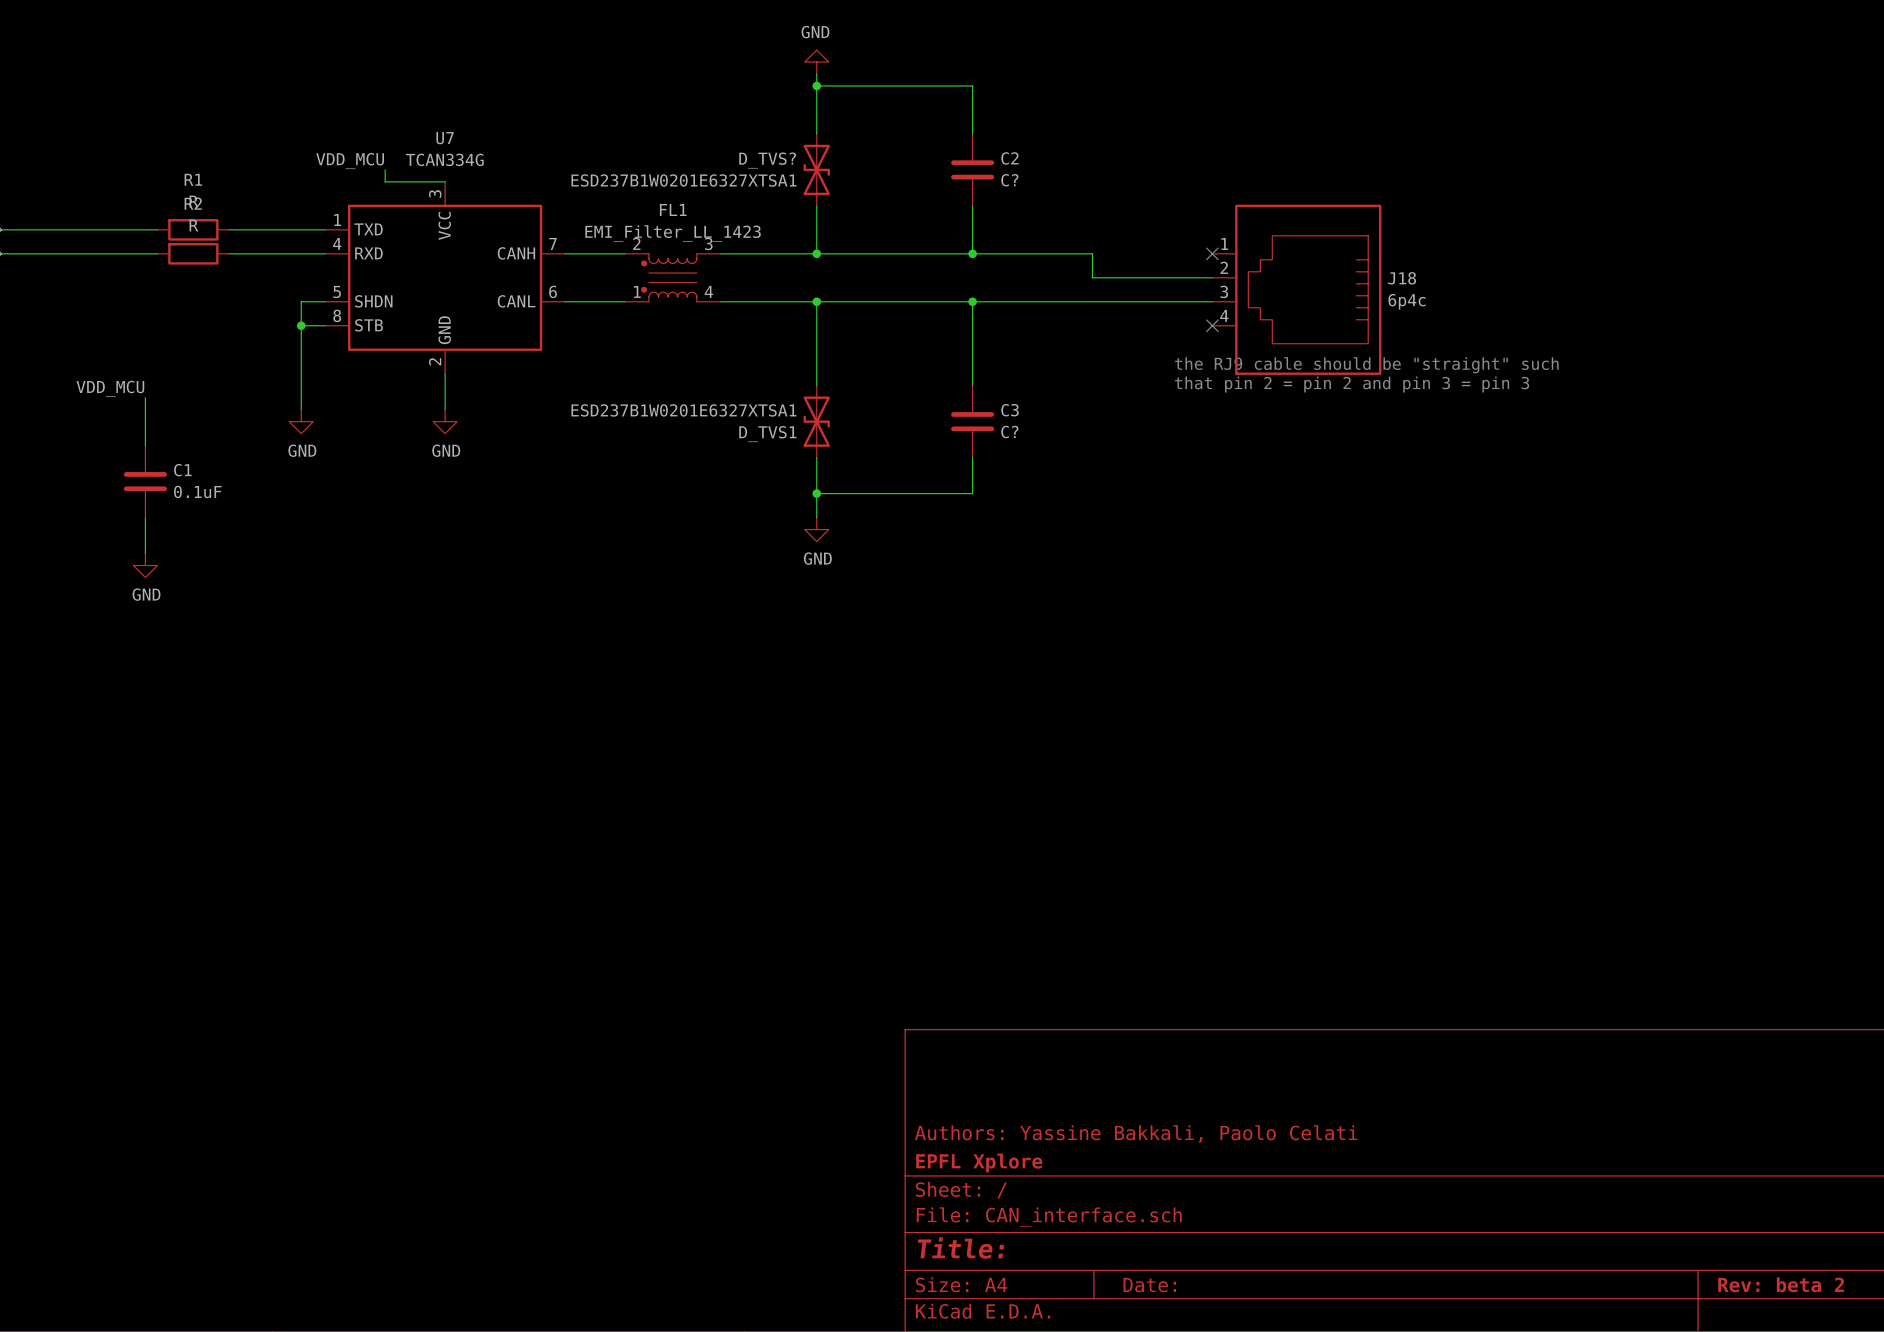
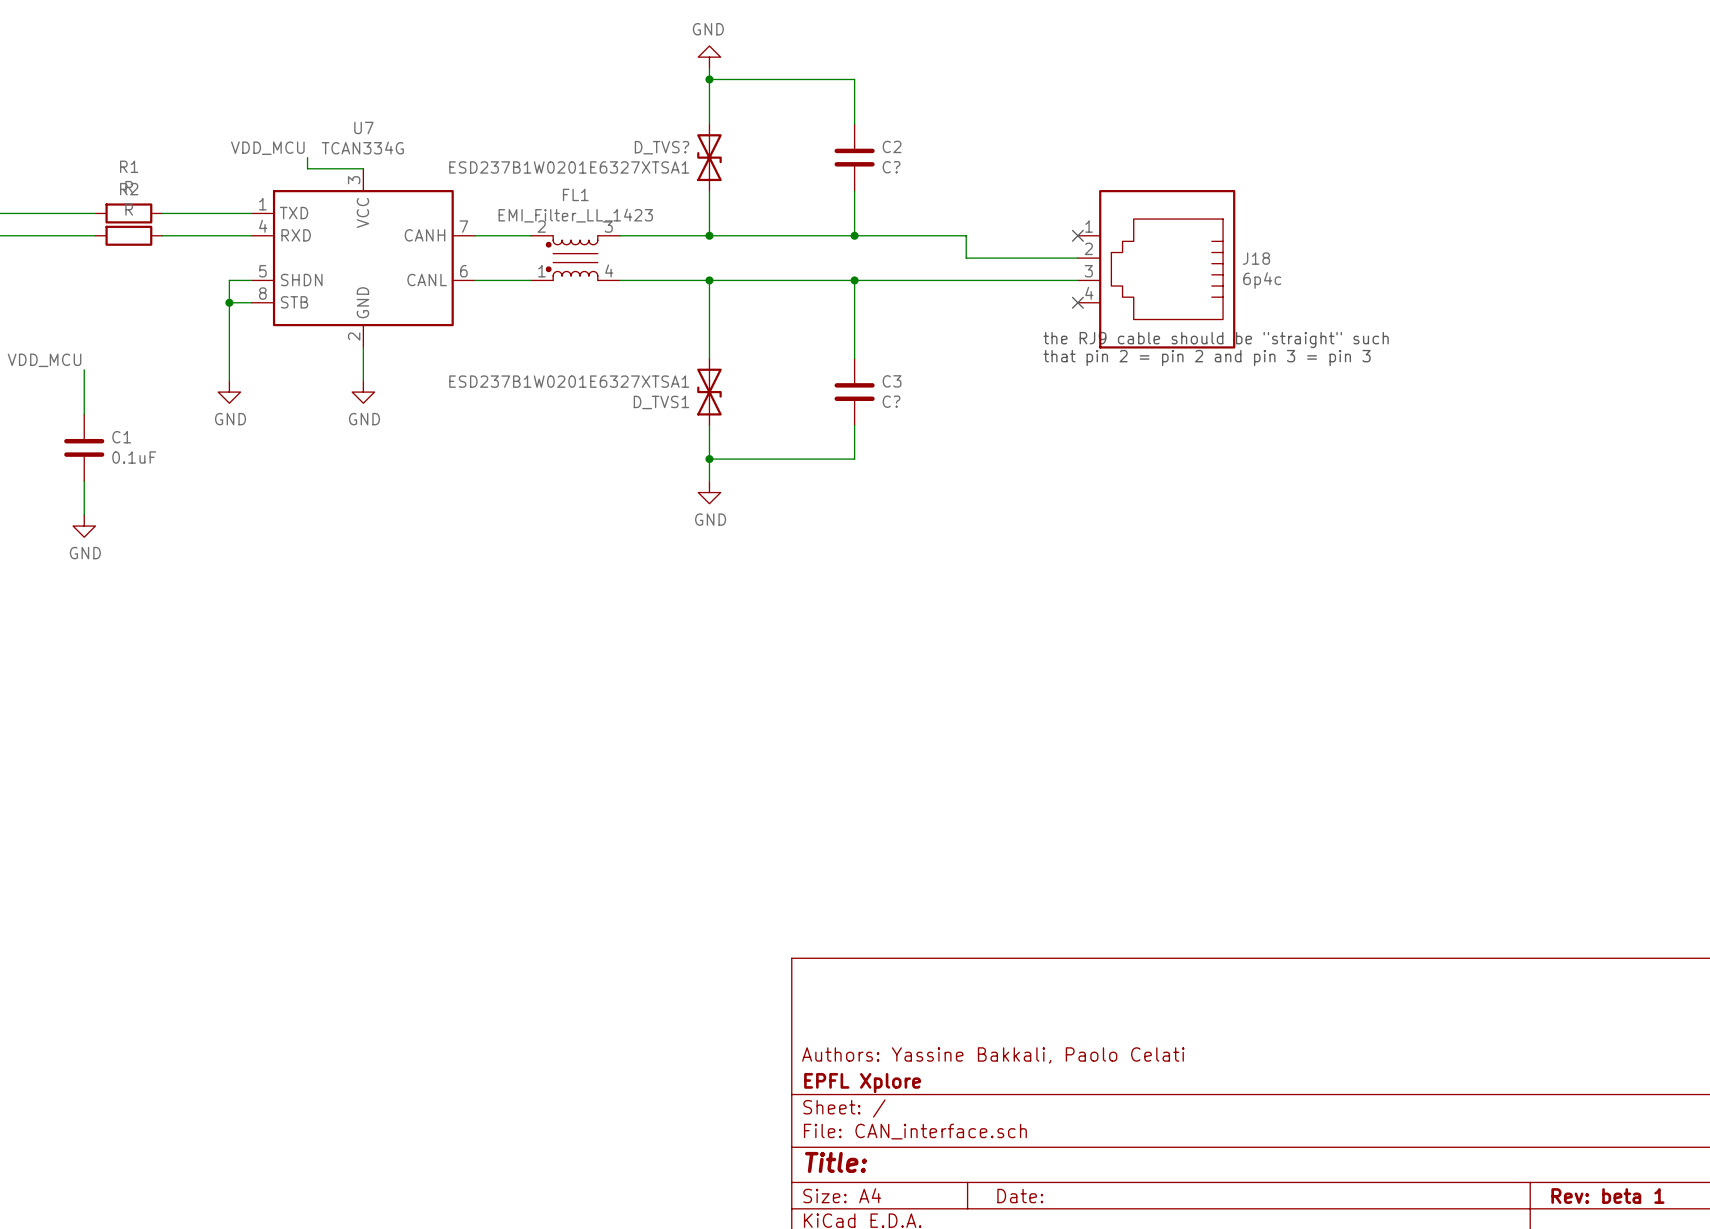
title block: Rev: beta 2 (1781, 1284) -> Rev: beta 1 (1607, 1196)

